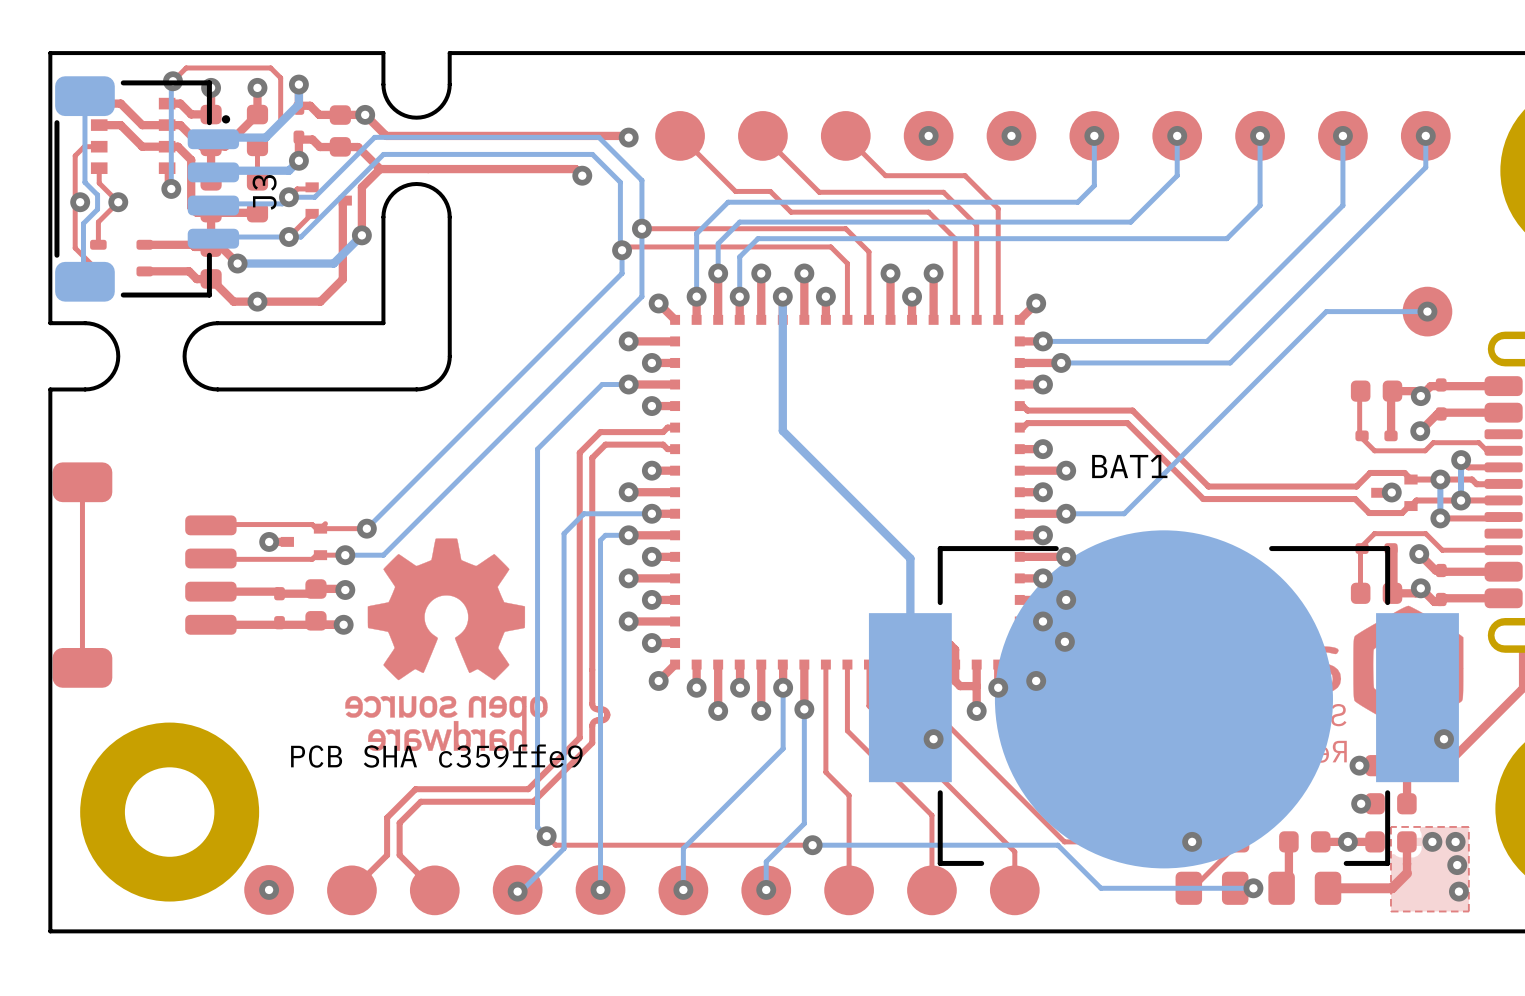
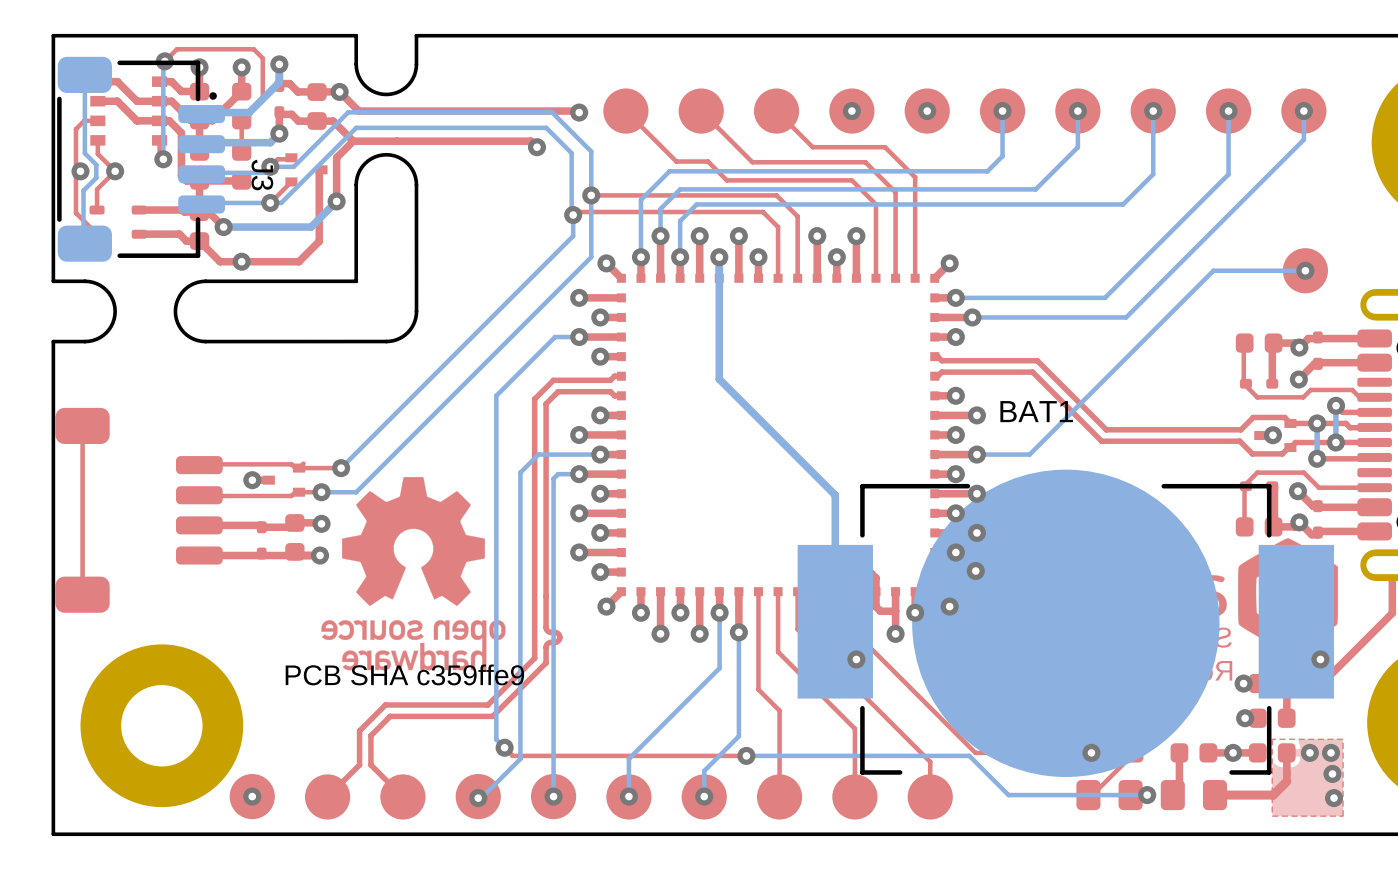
J3 name rotation: 0° (264, 192) -> 180° (262, 175)

